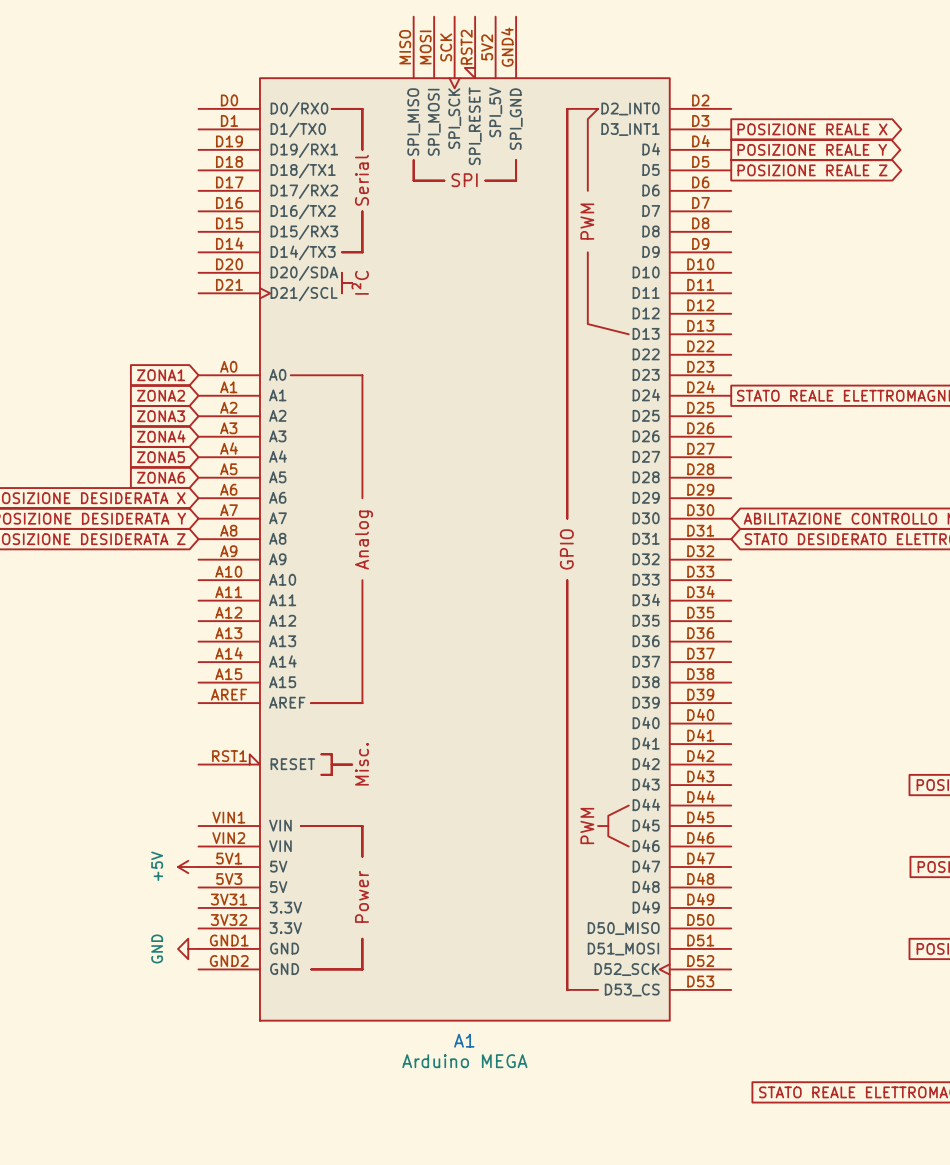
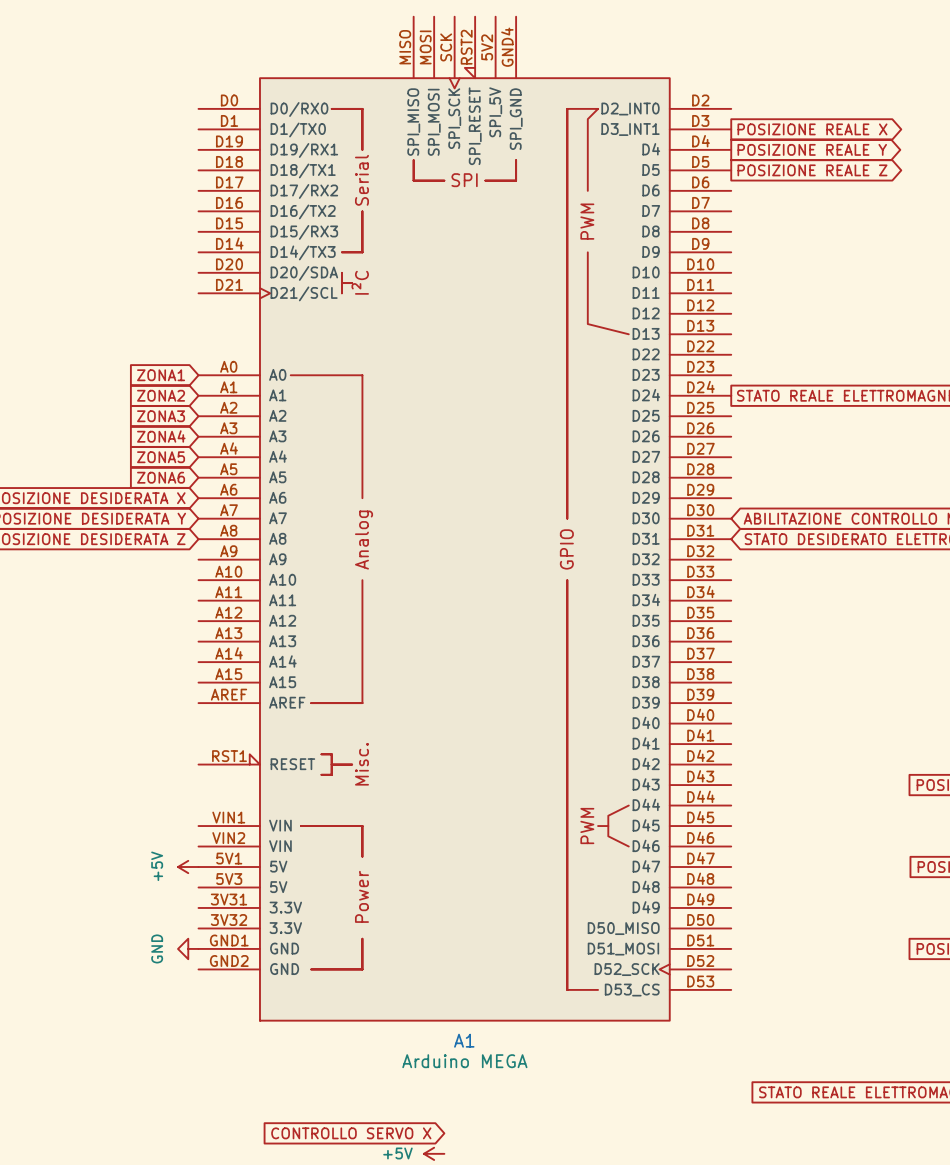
global label: none -> CONTROLLO SERVO X (351, 1133)
power symbol: none -> +5V (434, 1153)

